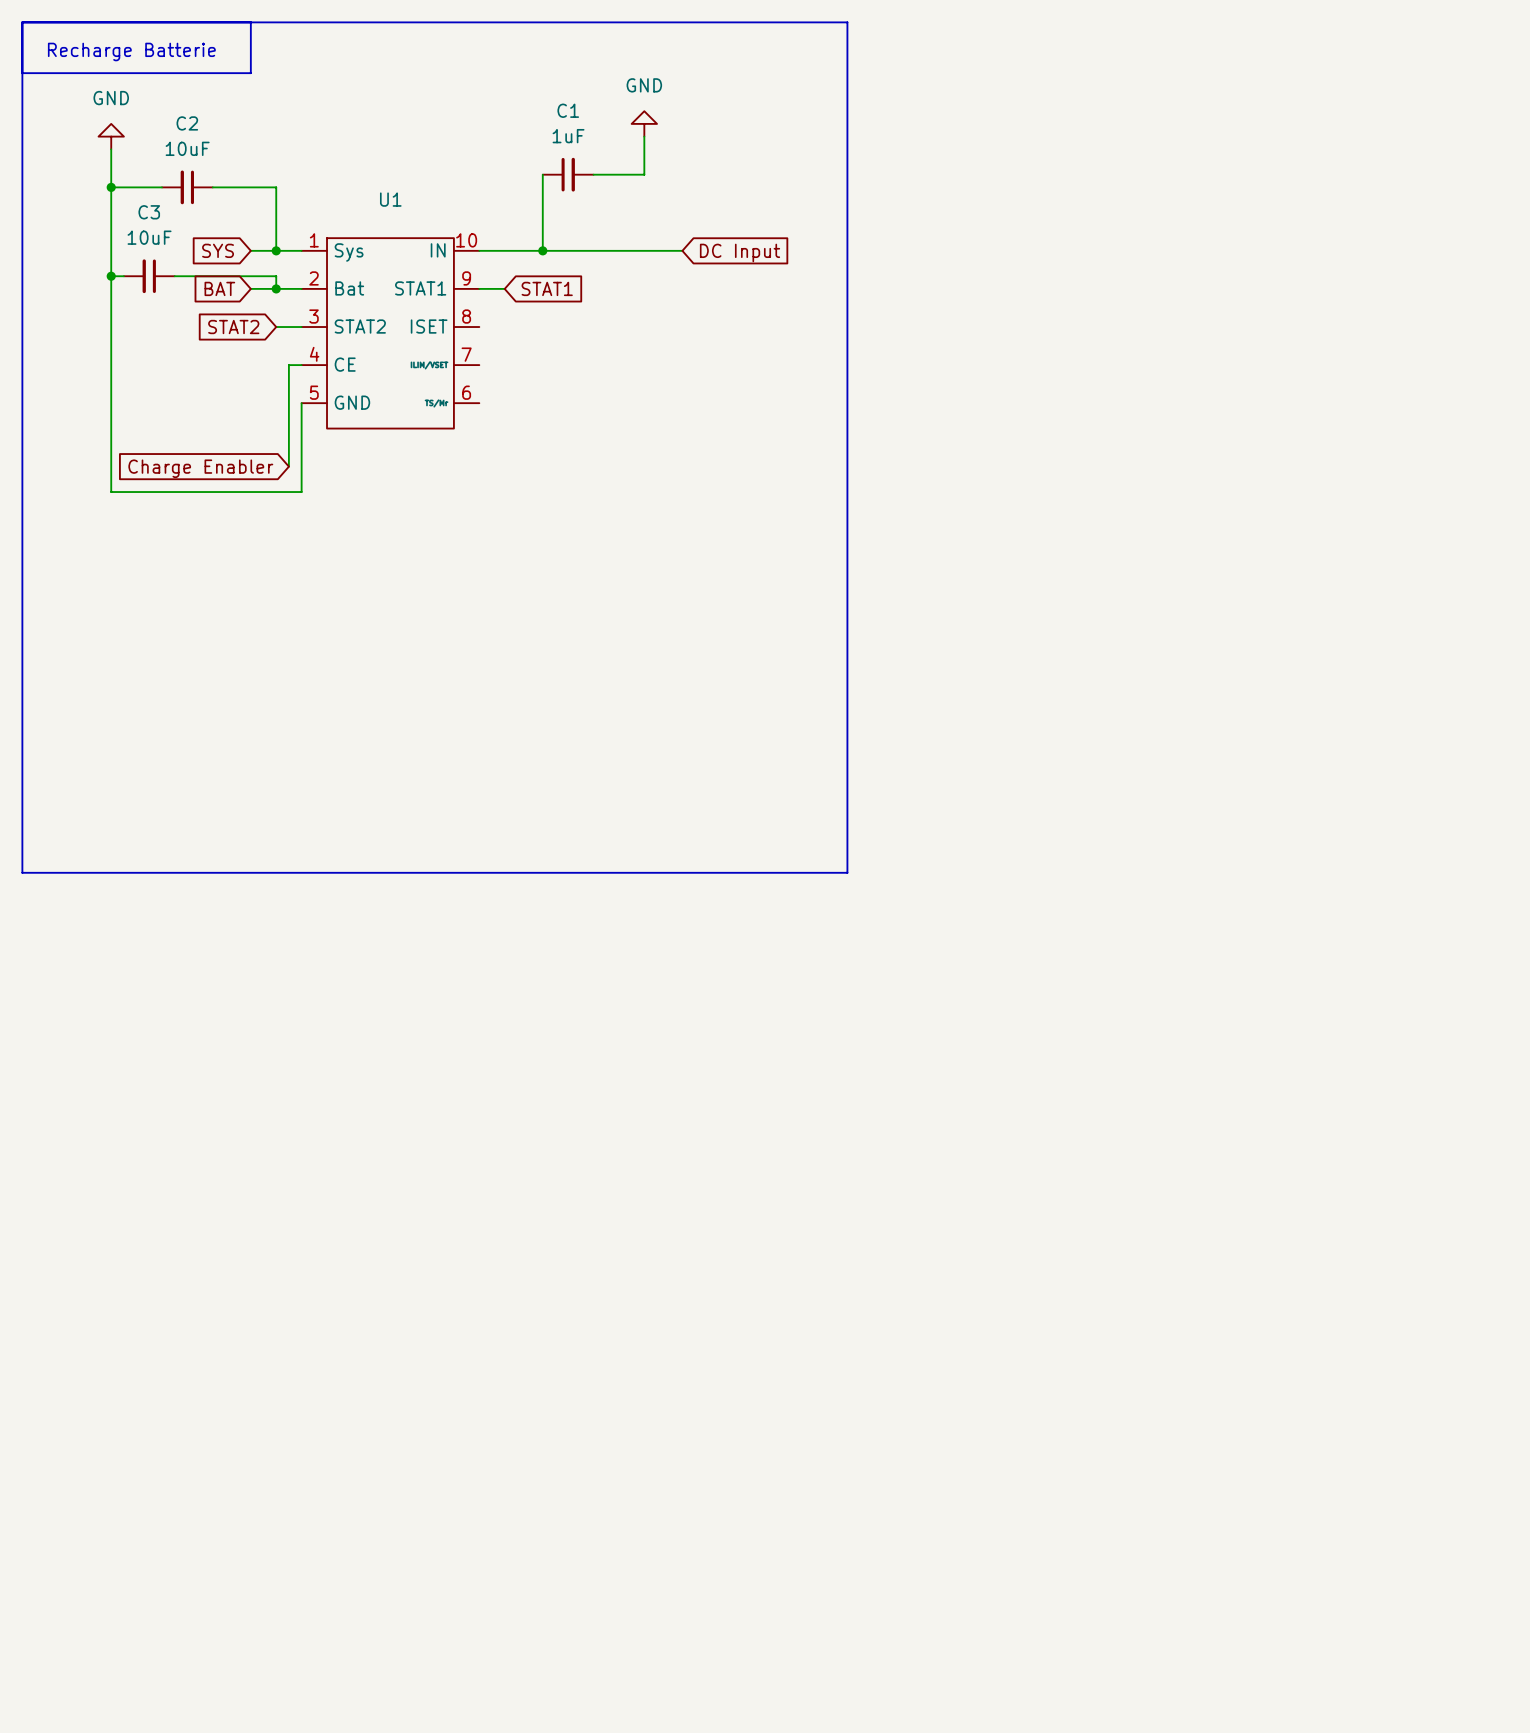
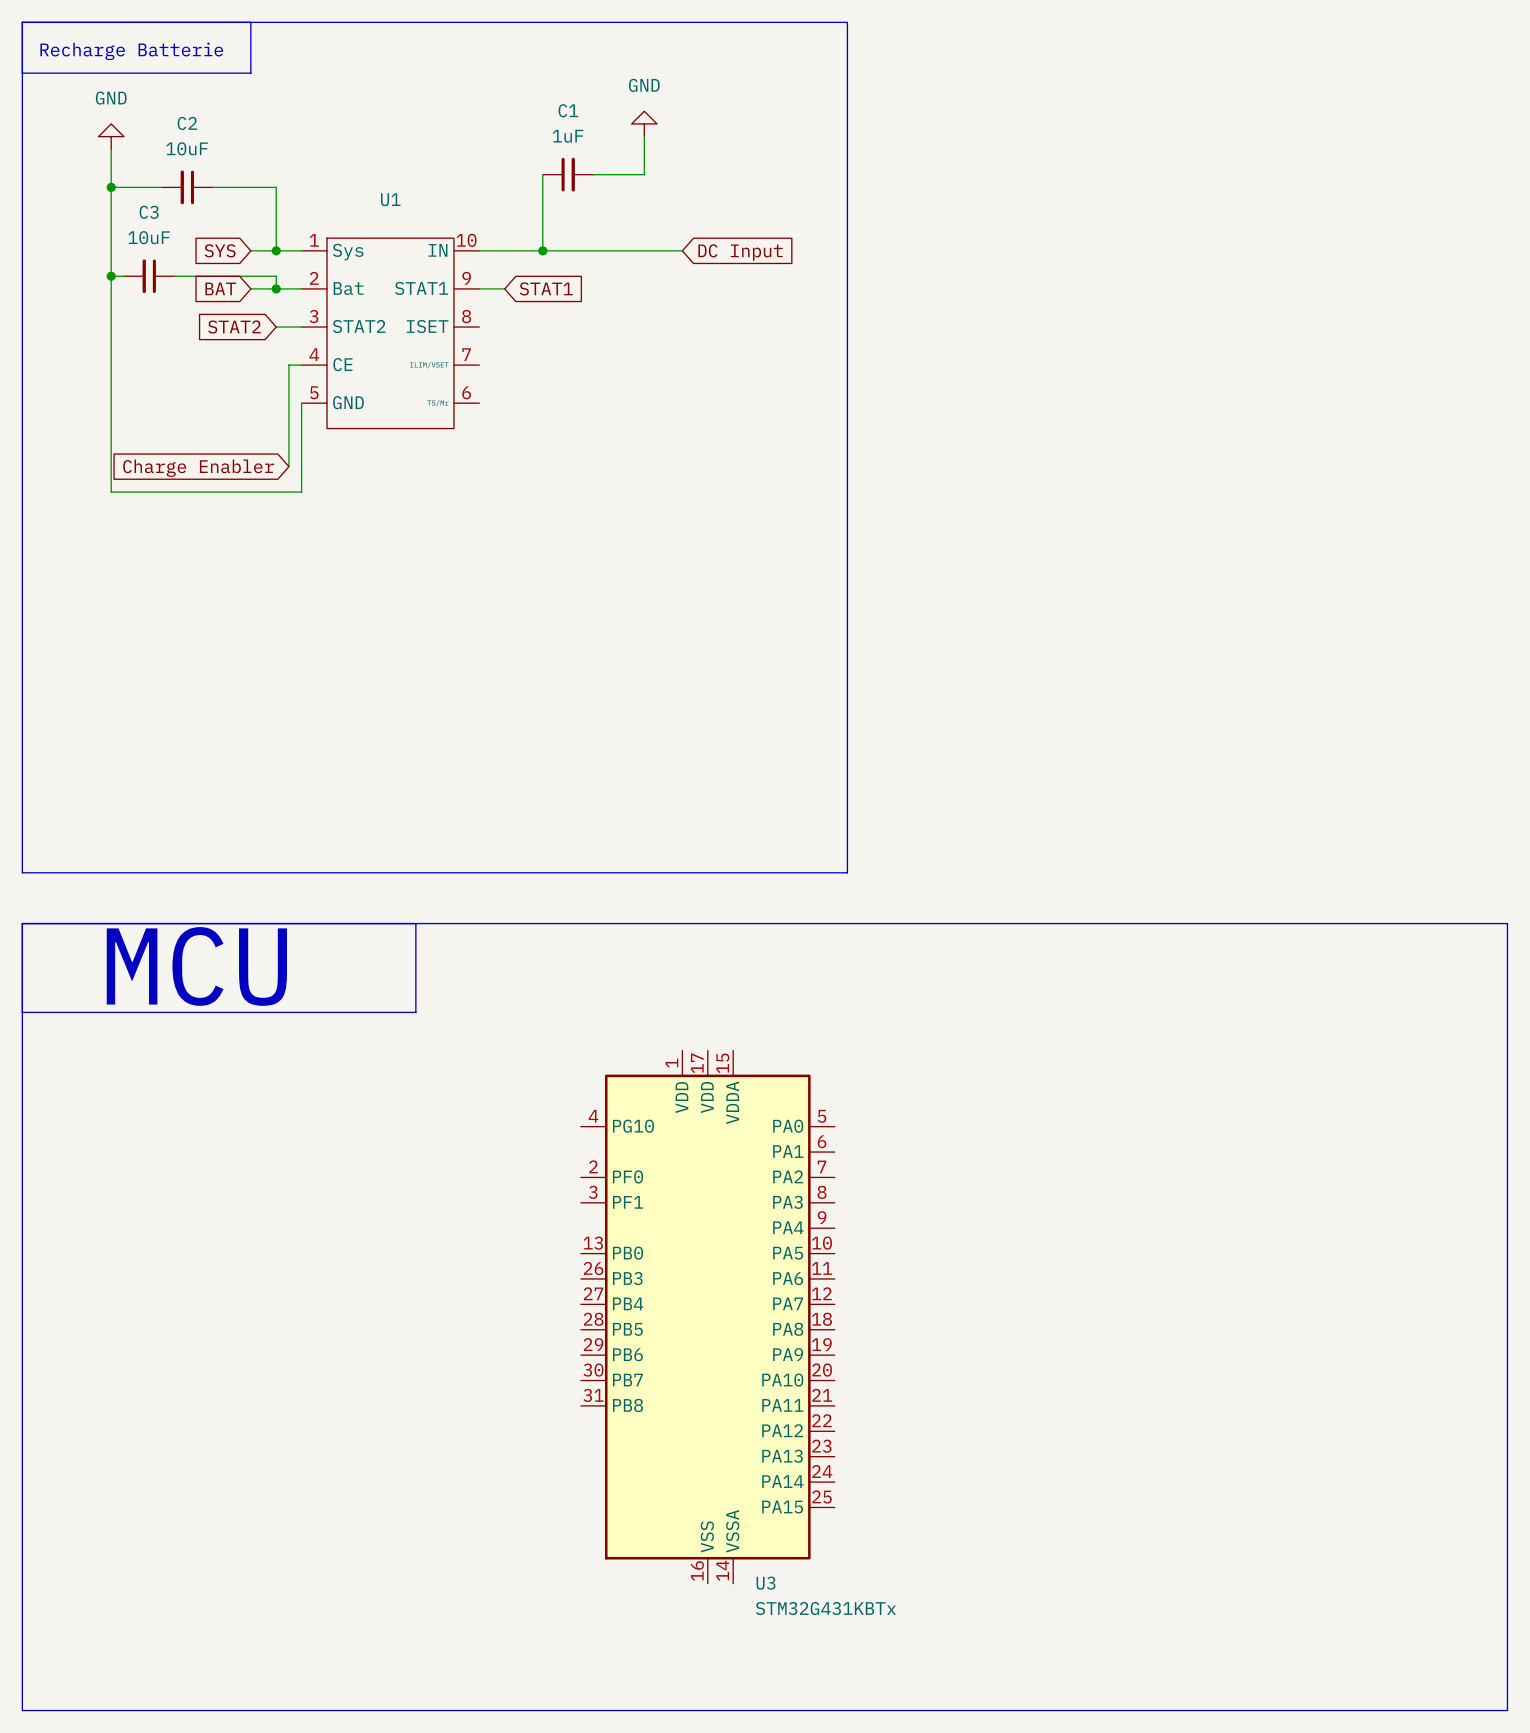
line: none -> (22, 923) (1507, 923) (1507, 1710) (22, 1710) (22, 923)
line: none -> (415, 923) (415, 1012) (22, 1012)
text: none -> MCU (196, 966)
U3: none -> STM32G431KBTx (707, 1317)

